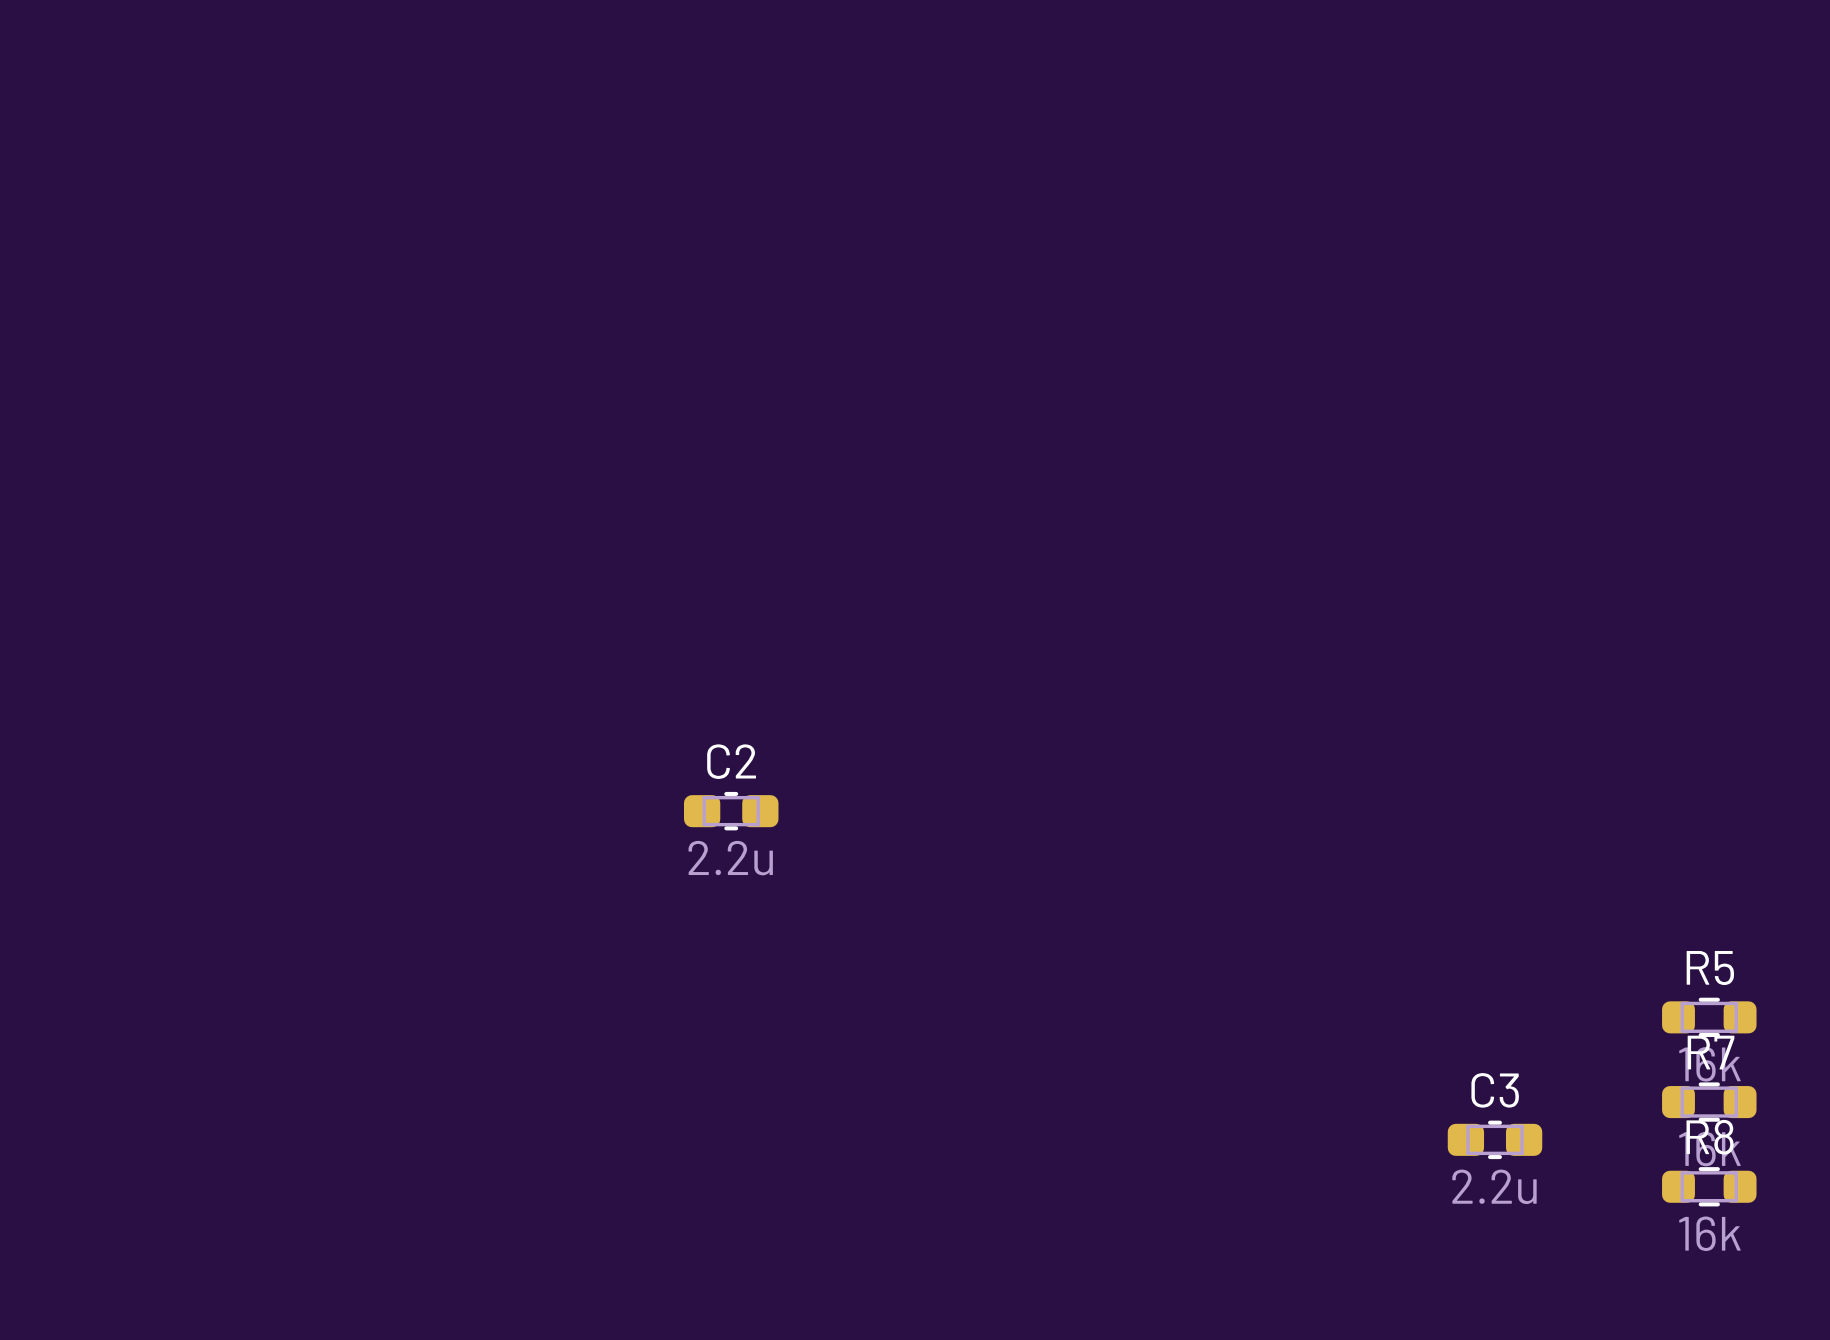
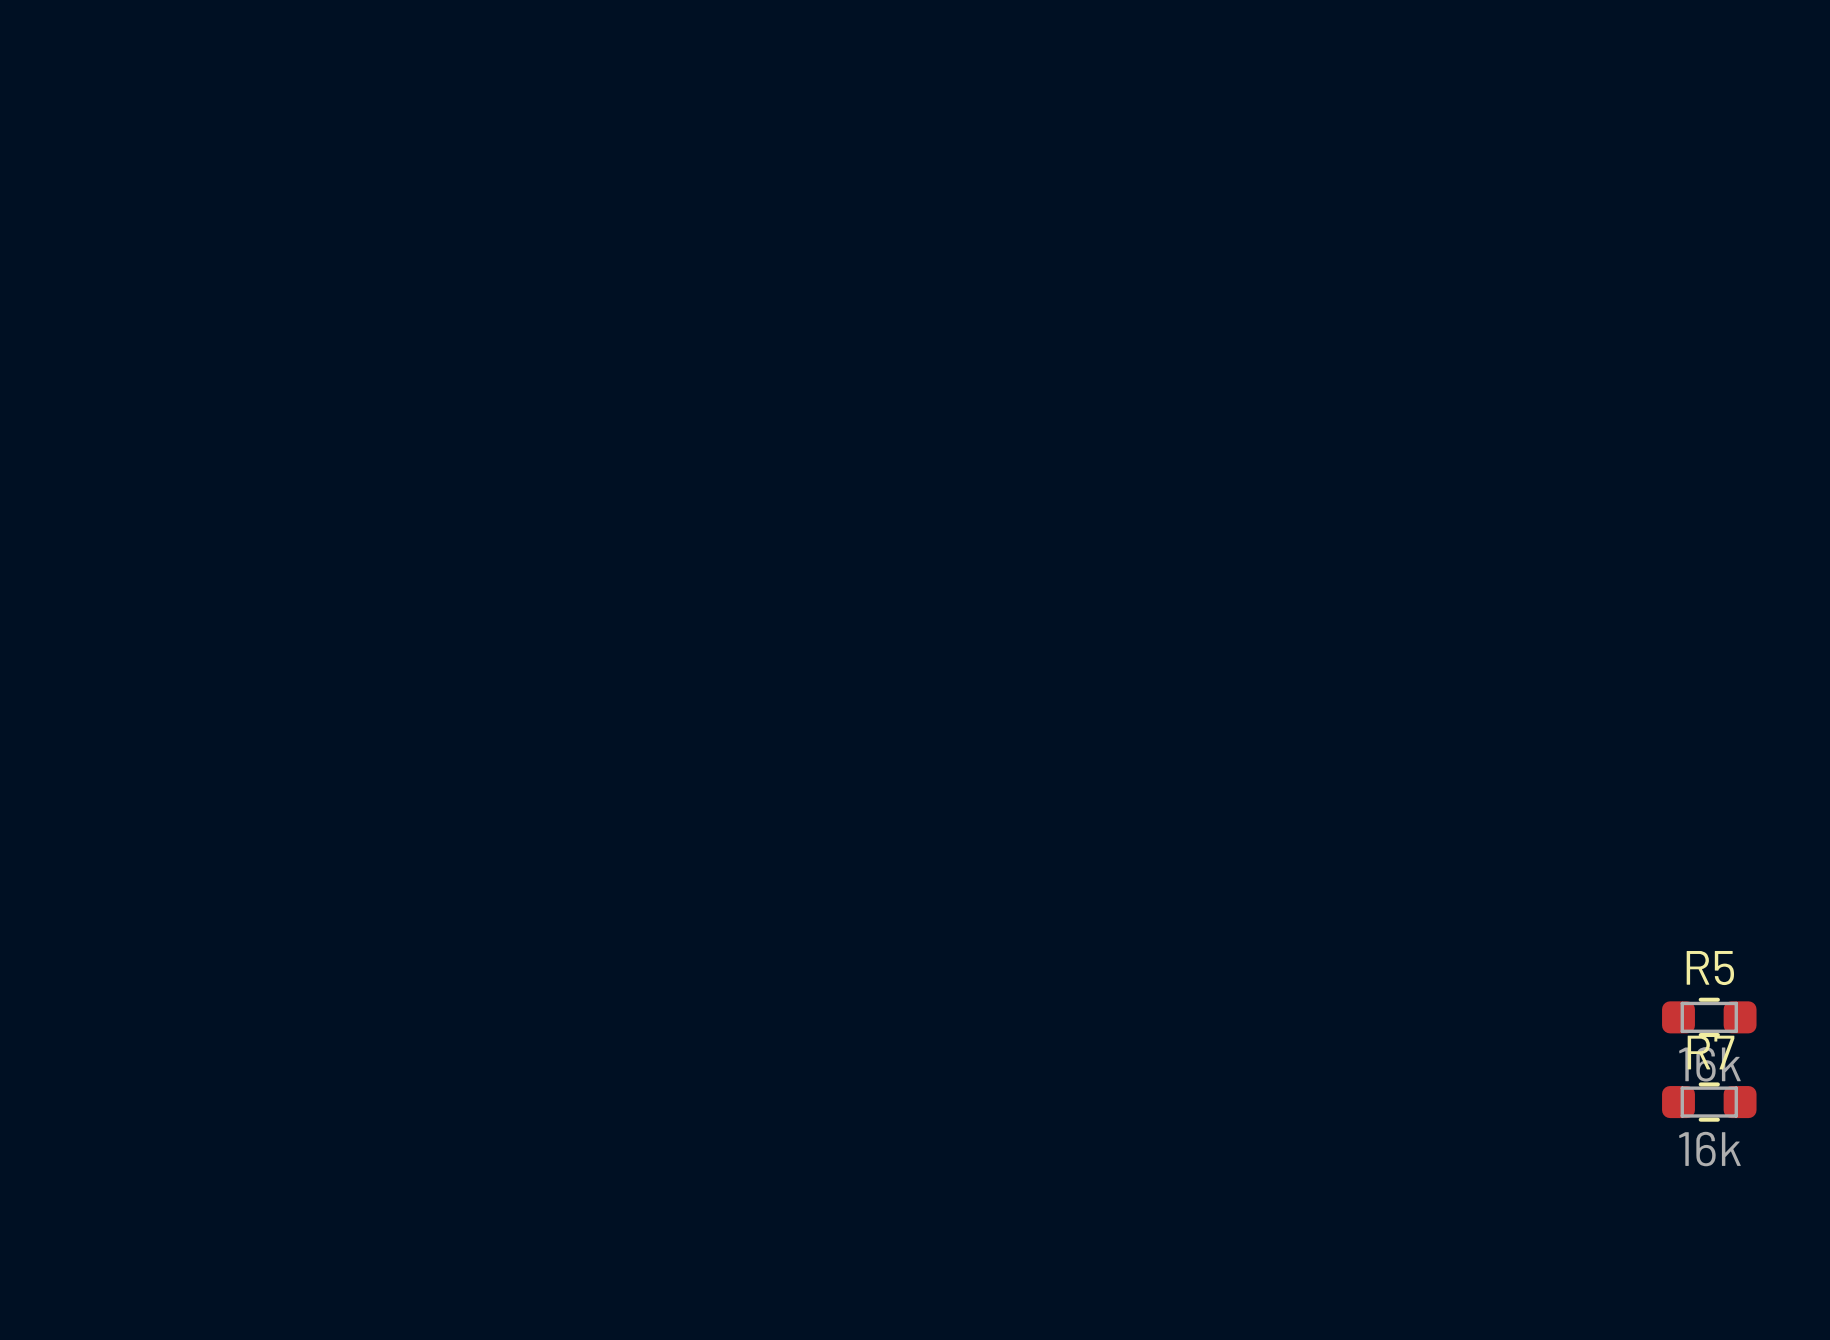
C2: 2.2u (731, 811) -> none
C3: 2.2u (1495, 1139) -> none
R8: 16k (1709, 1186) -> none

